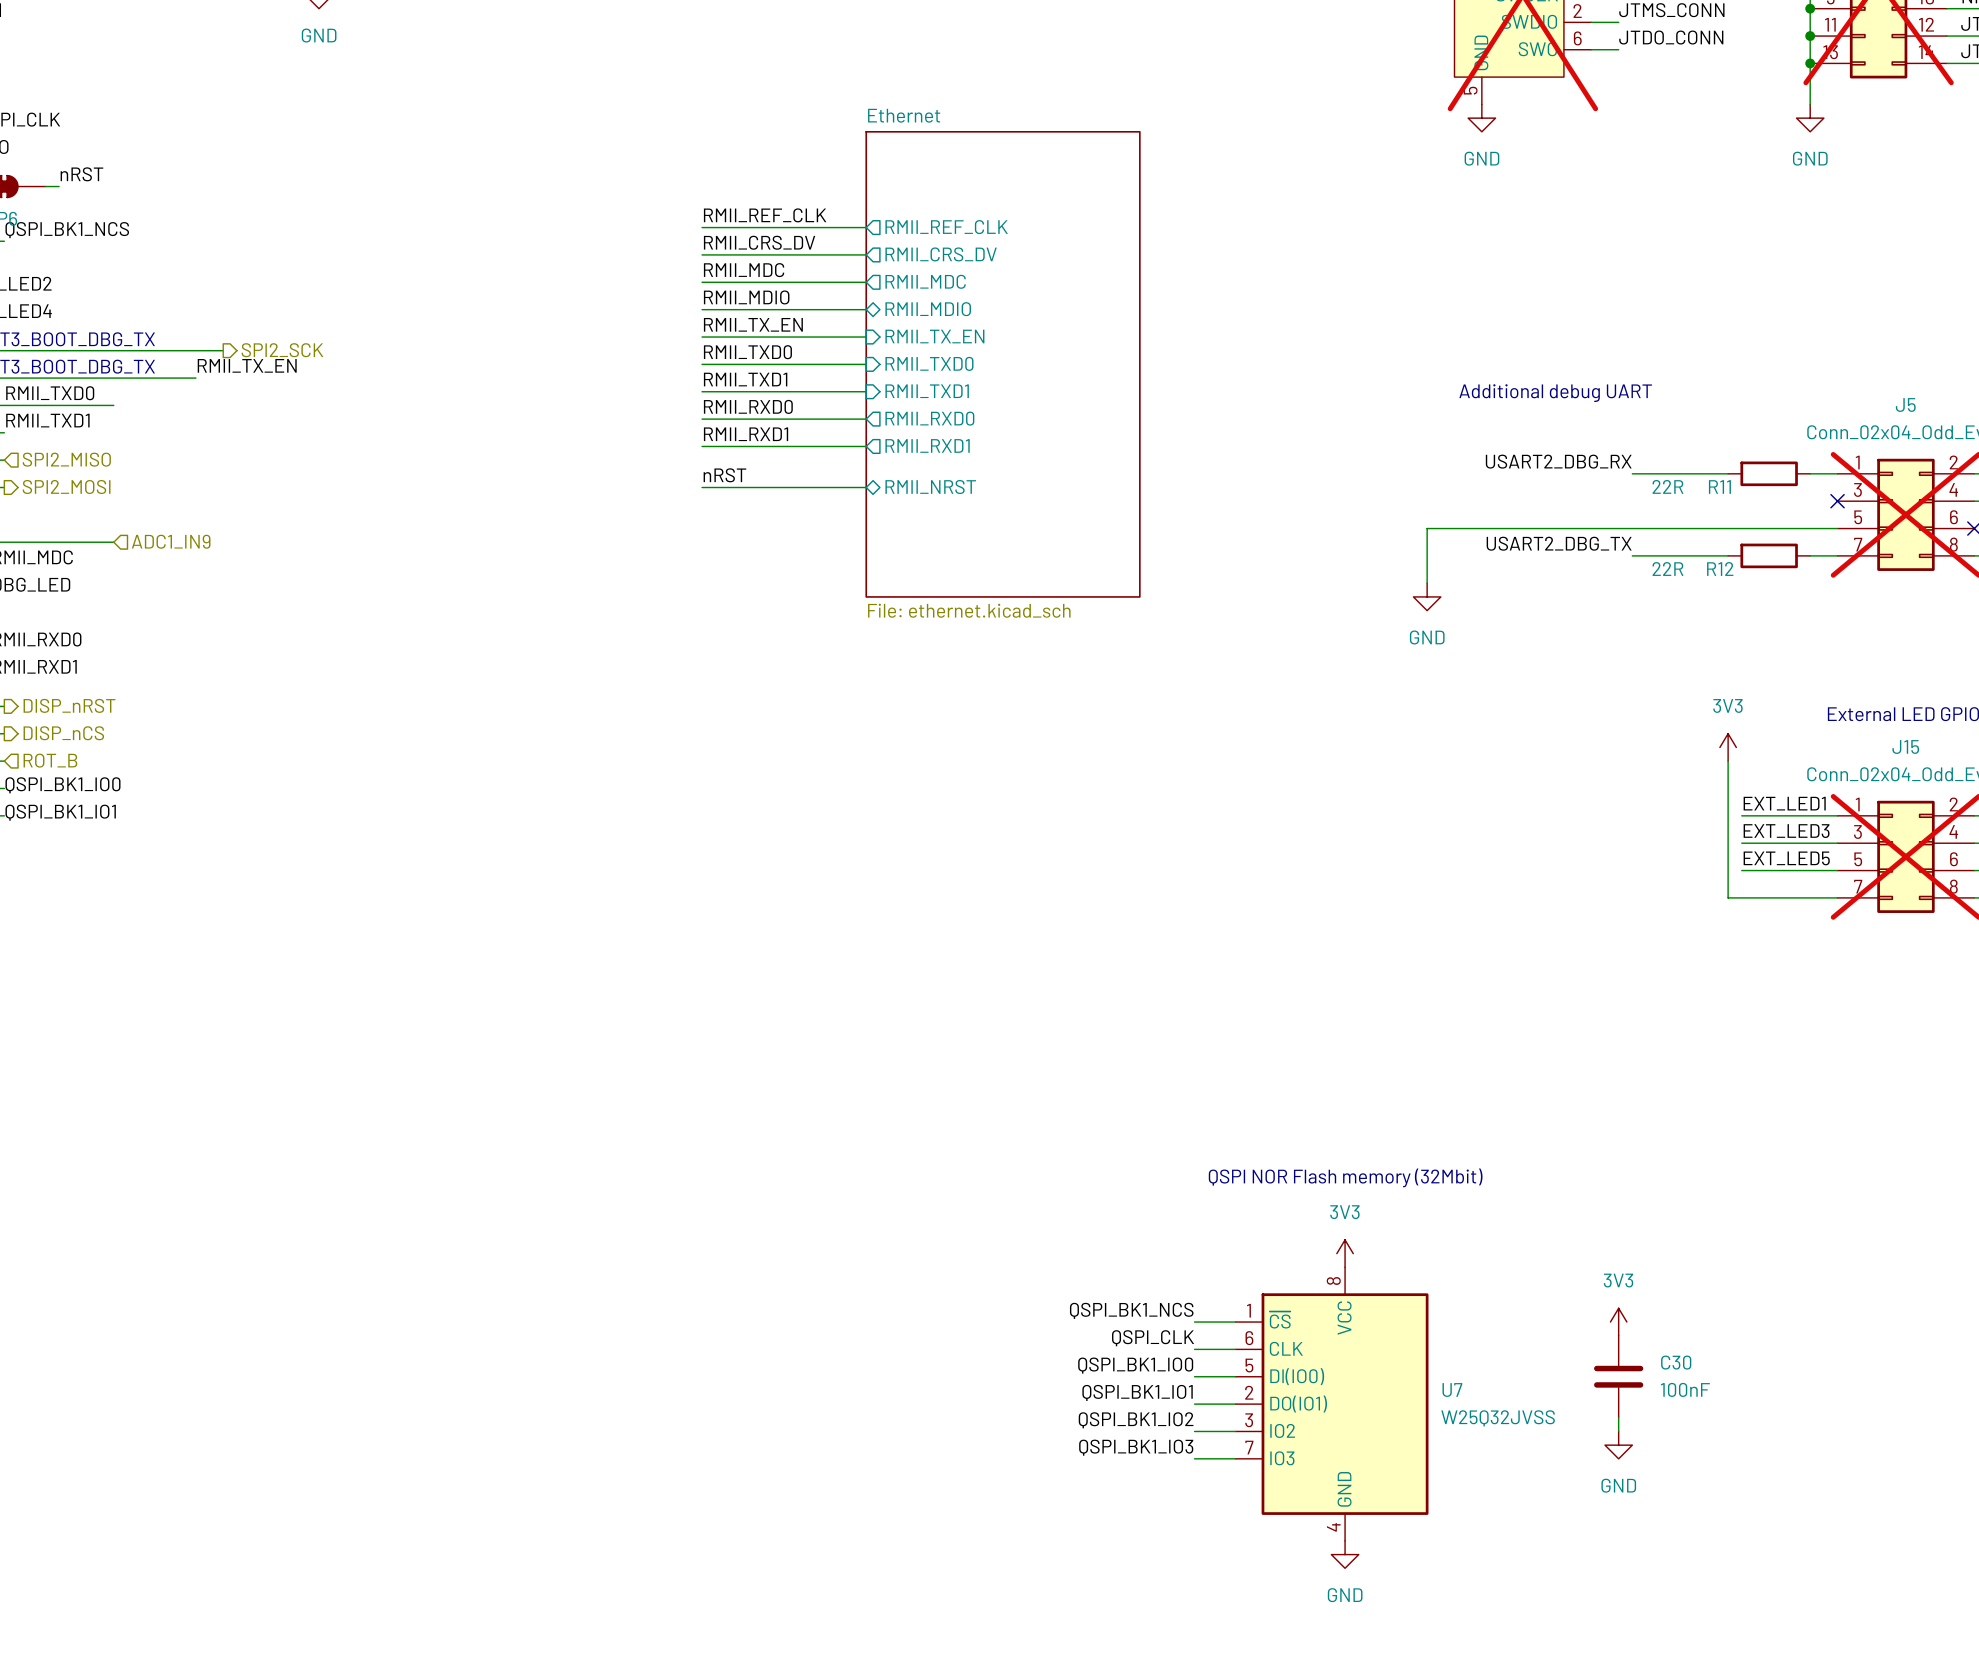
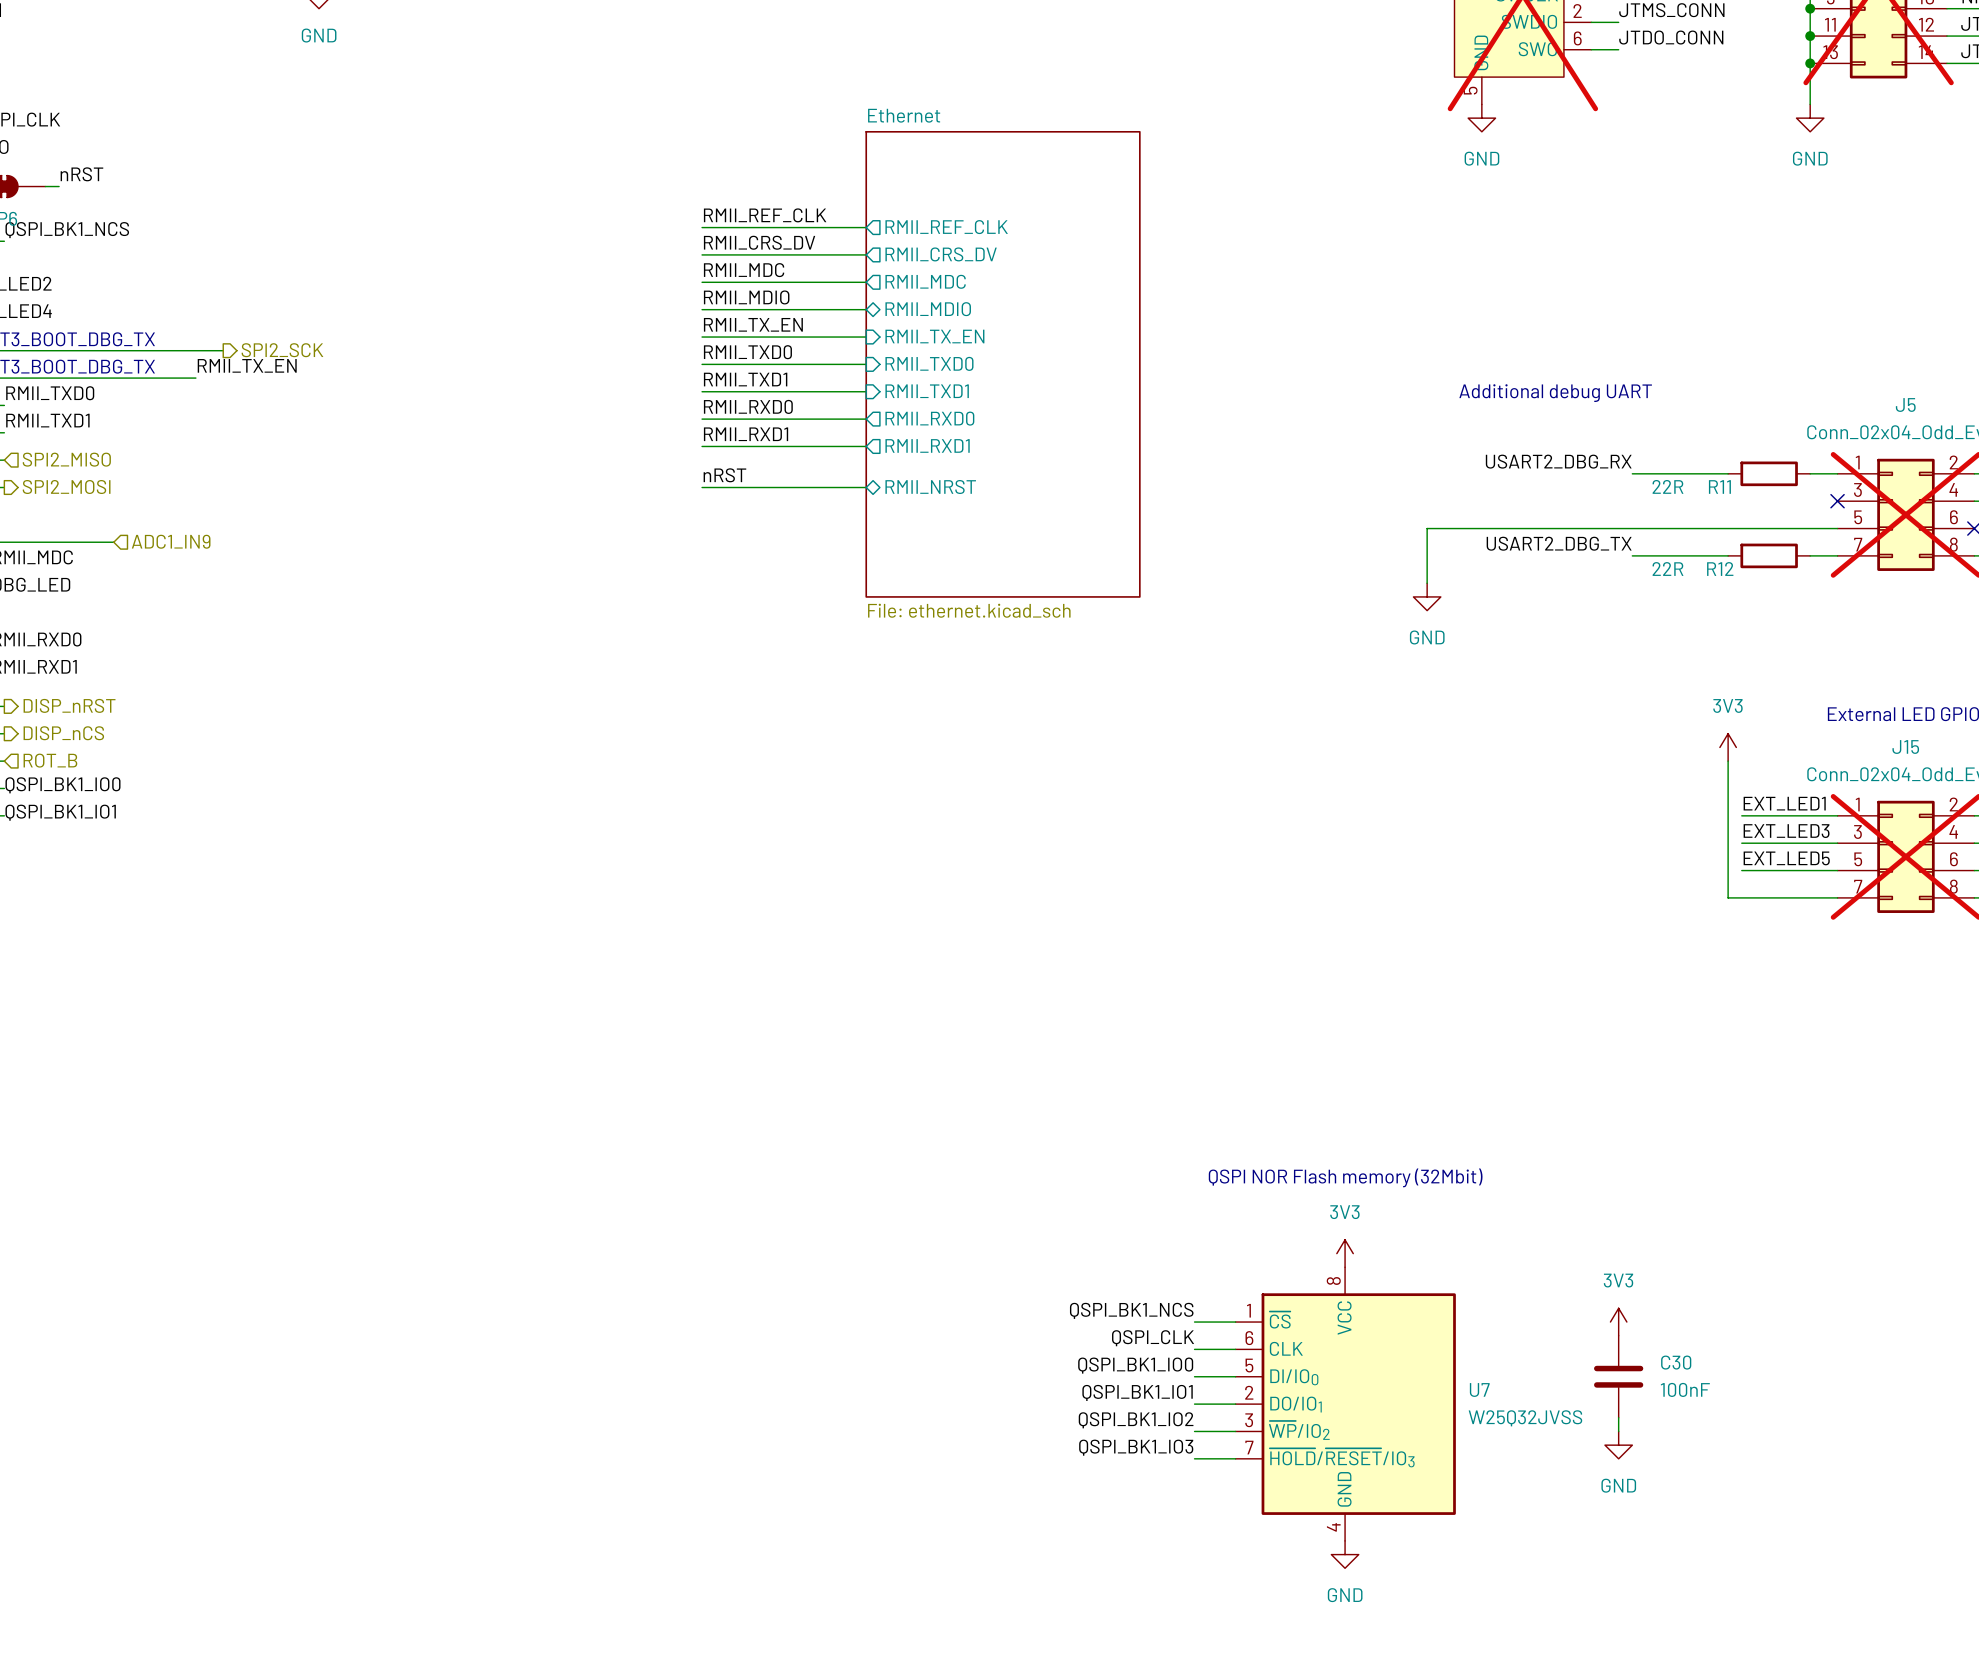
wire: (4, 405) (113, 405) -> none
U7 symbol: [1235, 1267, 1429, 1541] -> [1235, 1267, 1456, 1541]

